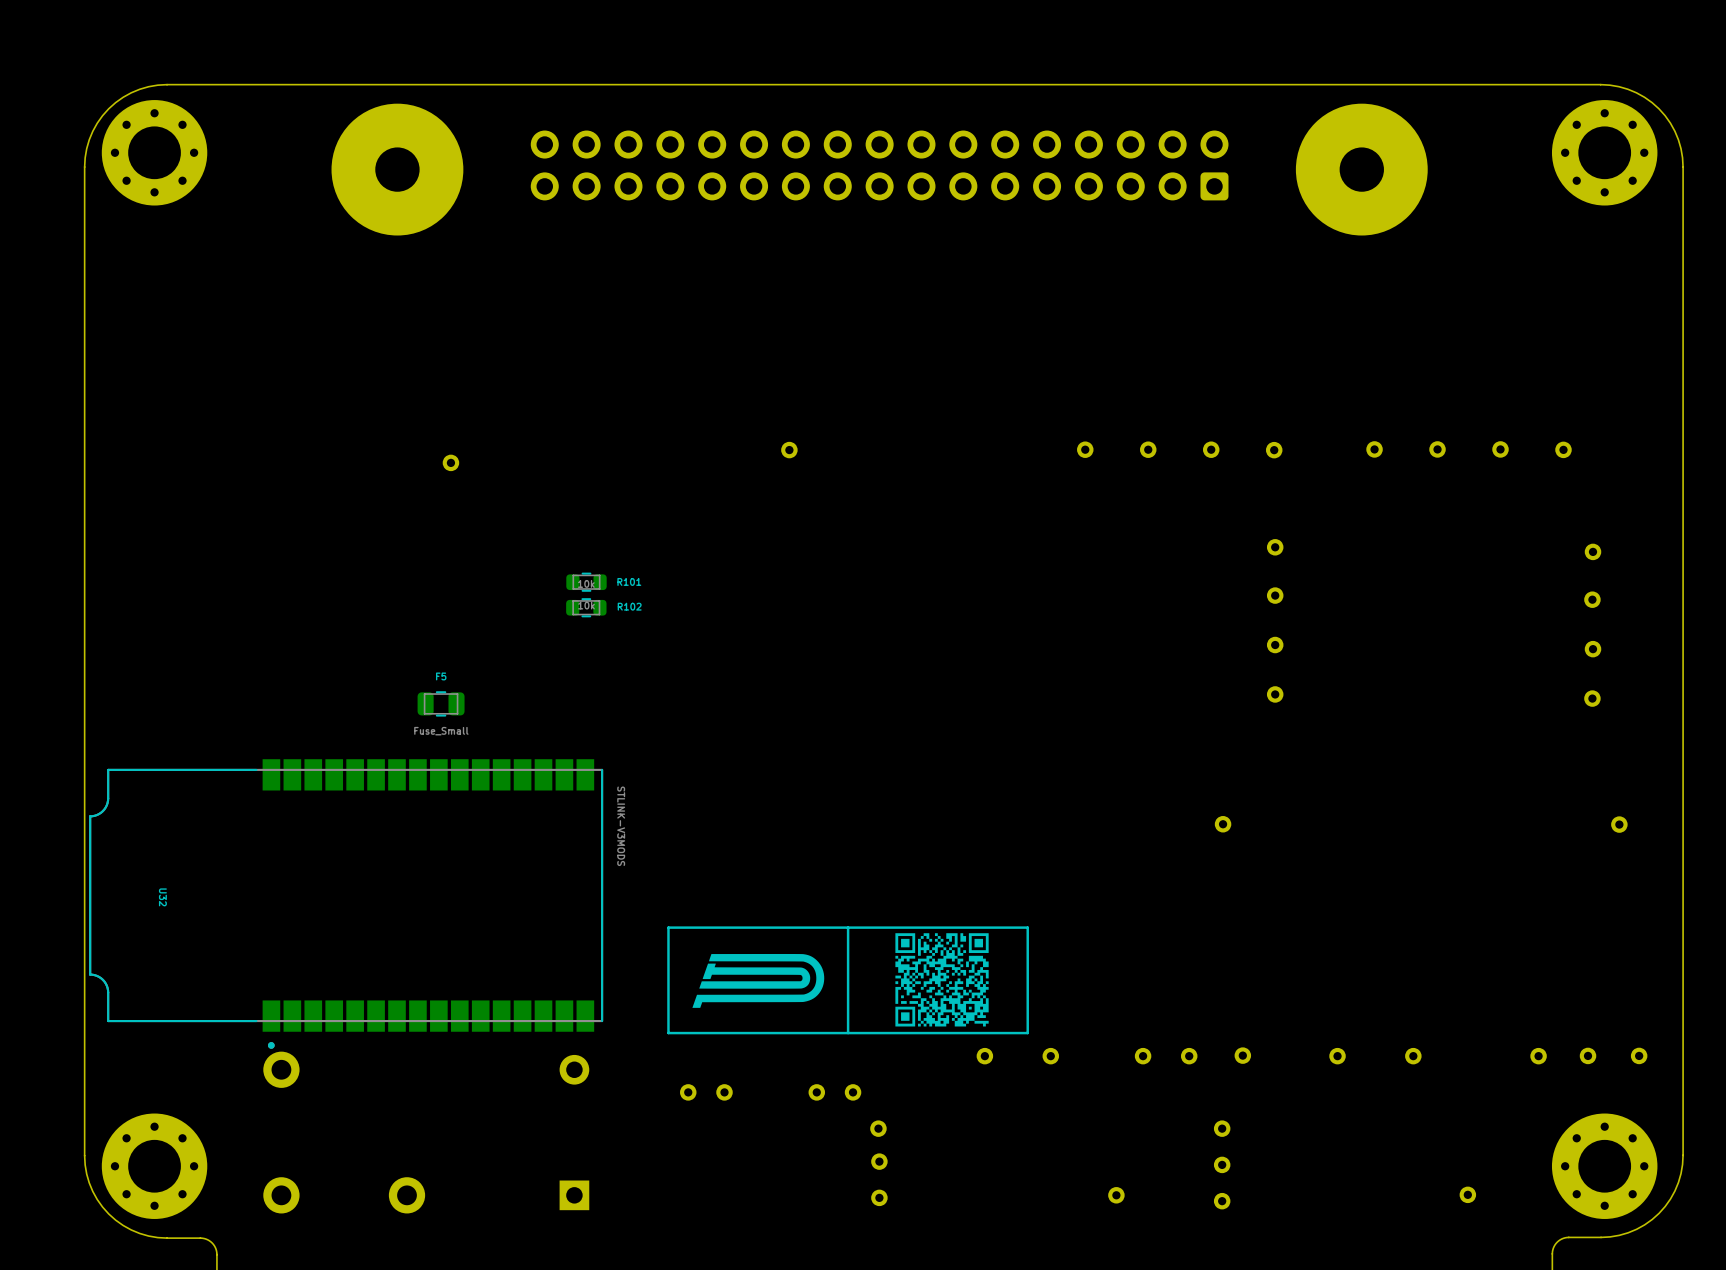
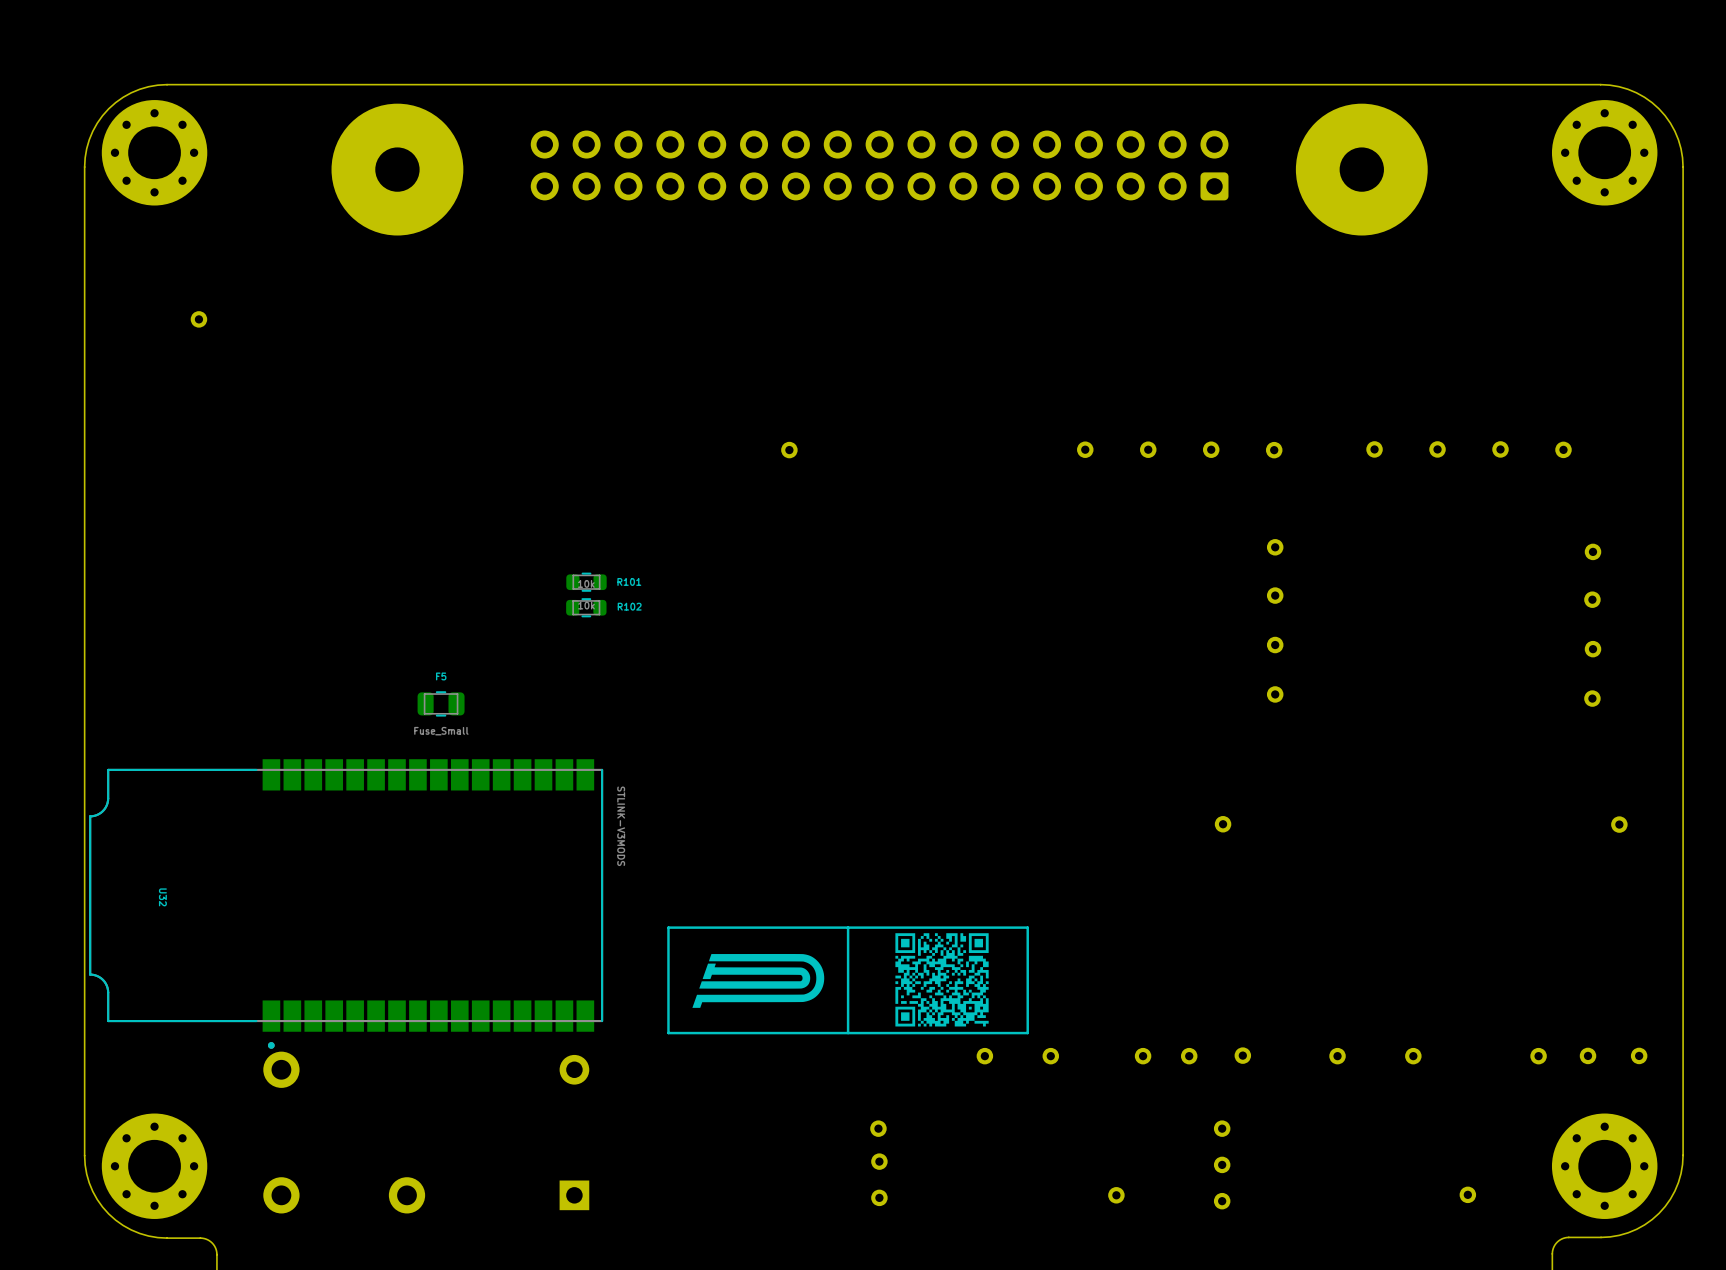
part position: (450, 462) -> (198, 319)
part: (688, 1092) -> none
part: (724, 1092) -> none
part: (816, 1092) -> none
part: (853, 1092) -> none

